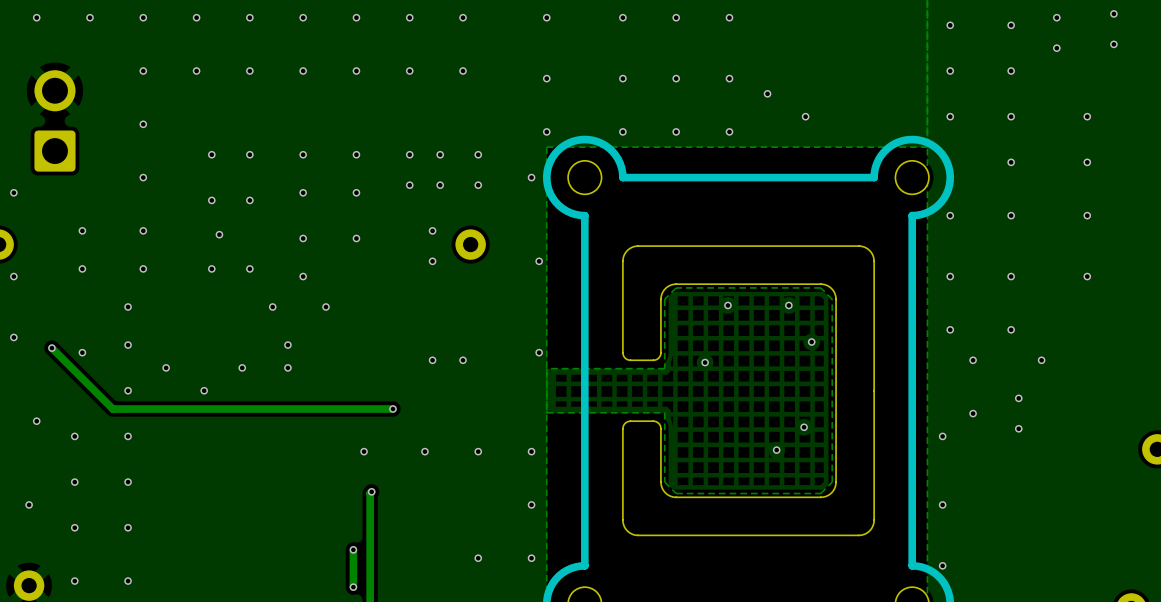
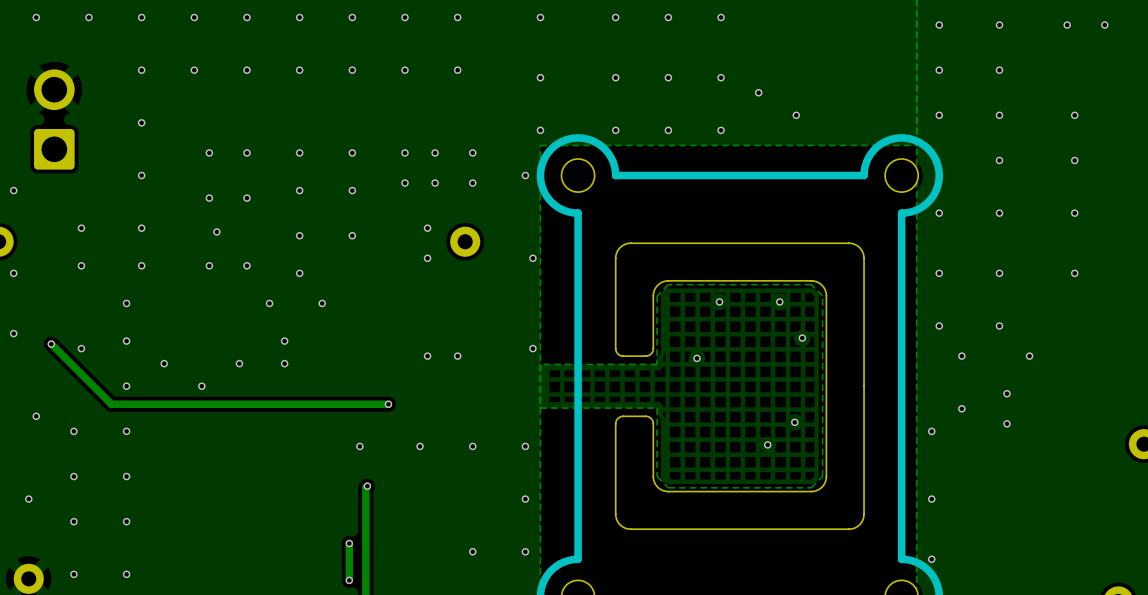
via: (1113, 13) -> none
via: (1056, 17) -> none
via: none -> (1067, 25)
via: none -> (1104, 25)
via: (1113, 44) -> none
via: (1056, 48) -> none

